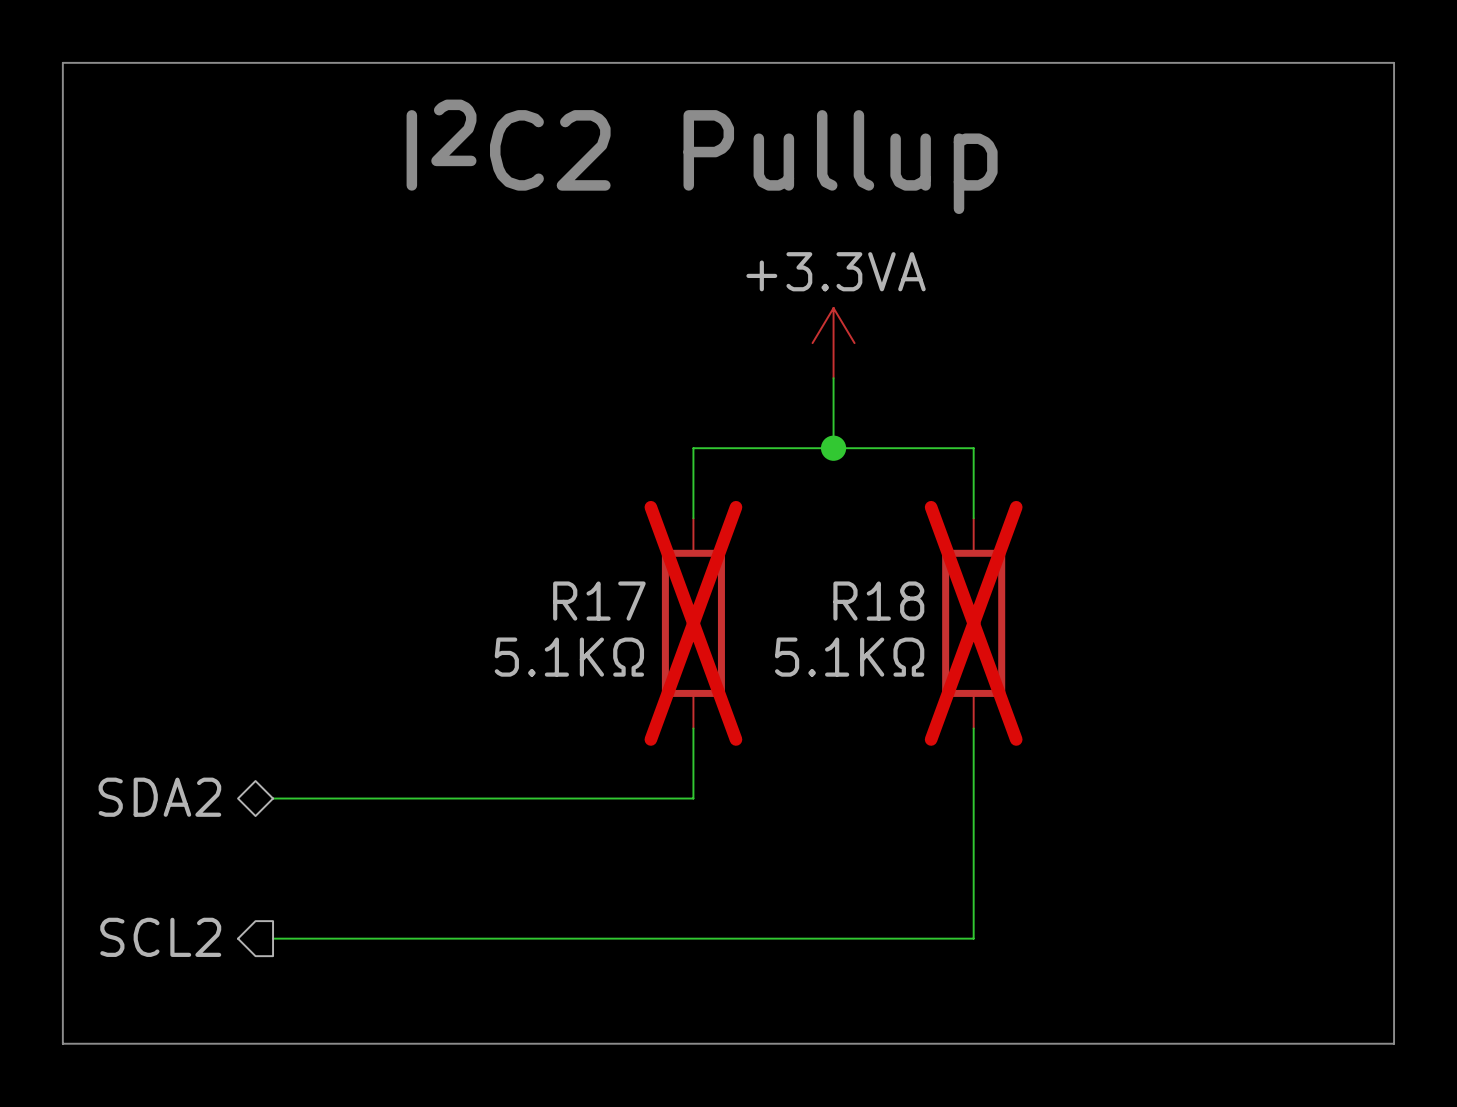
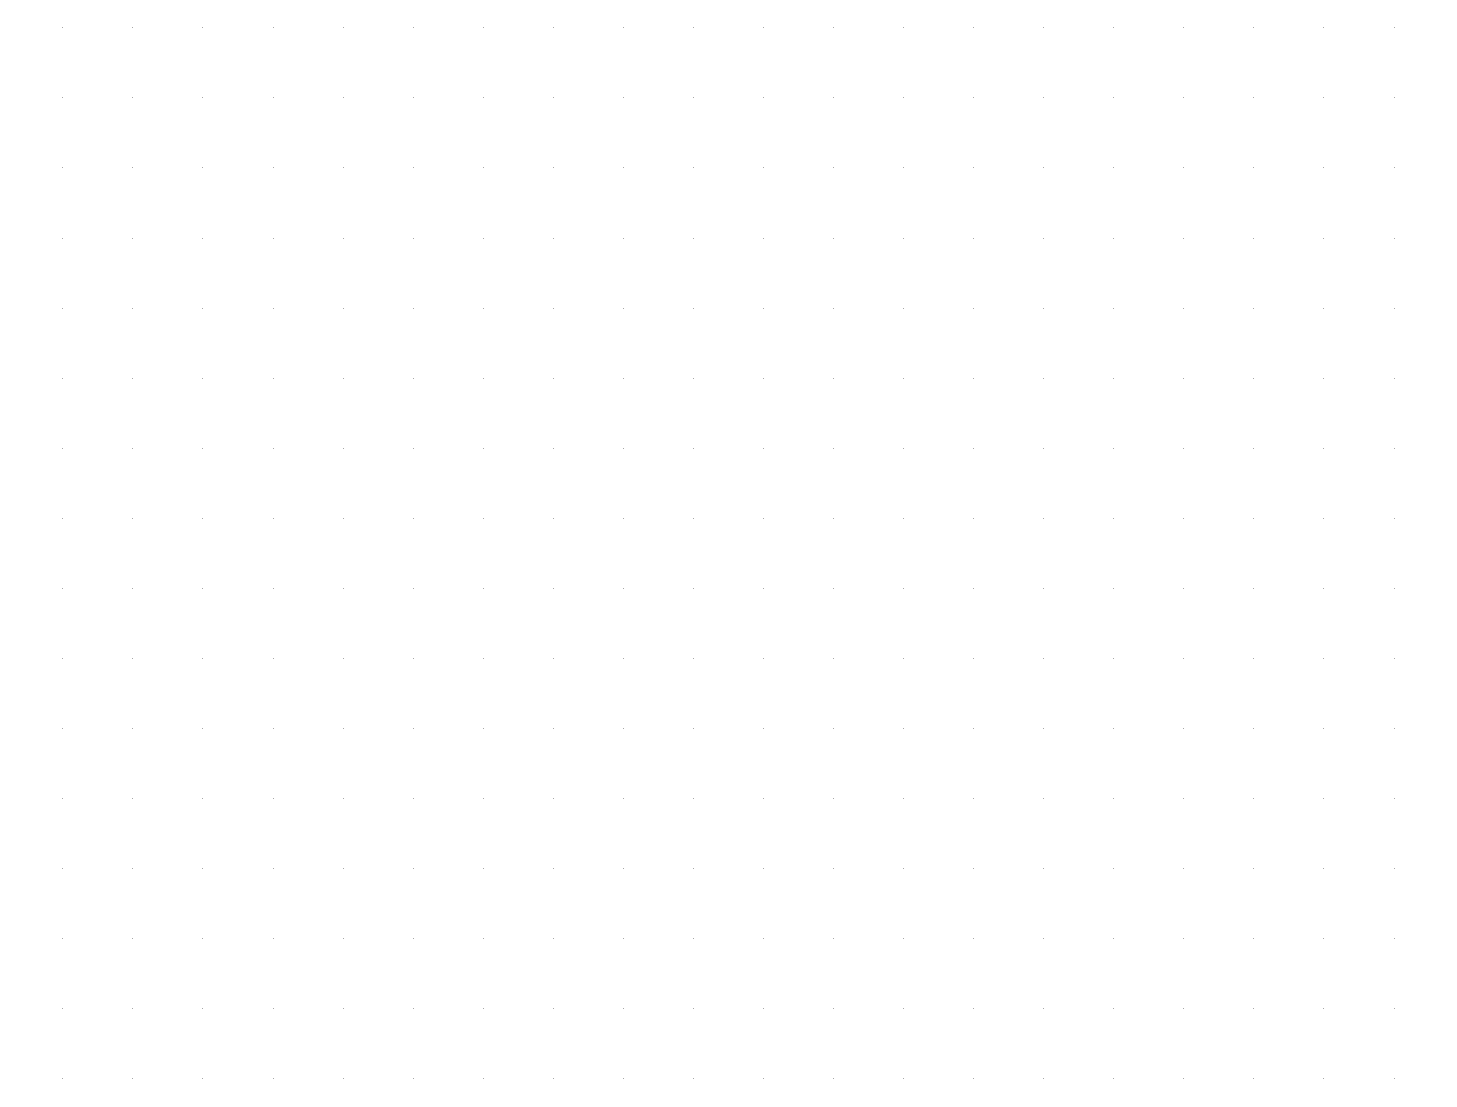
line: (62, 62) (1394, 62) (1394, 1043) (62, 1043) (62, 62) -> none
text: I2C2 Pullup (702, 156) -> none
power symbol: +3.3VA (833, 343) -> none
wire: (833, 378) (833, 448) -> none
junction: (833, 448) -> none
wire: (693, 518) (693, 448) (973, 448) (973, 518) -> none
R17: 5.1KΩ (693, 623) -> none
R18: 5.1KΩ (973, 623) -> none
wire: (693, 728) (693, 798) (273, 798) -> none
wire: (973, 728) (973, 938) (273, 938) -> none
hierarchical label: SDA2 (159, 797) -> none
hierarchical label: SCL2 (160, 937) -> none

